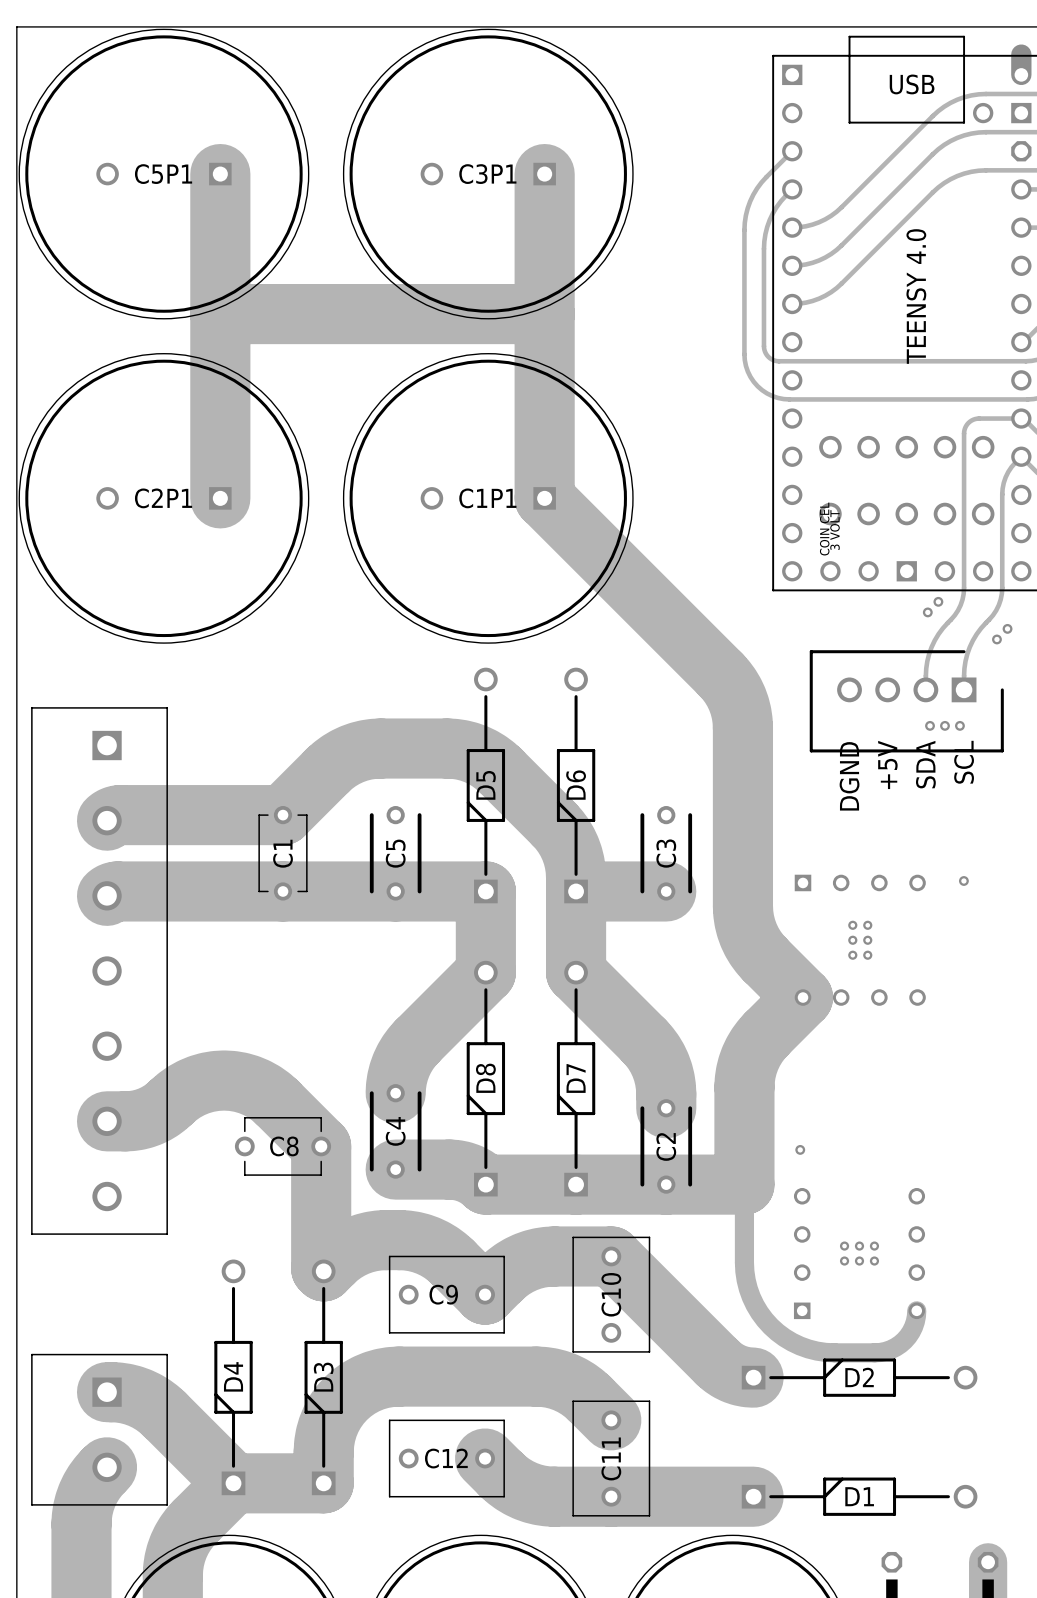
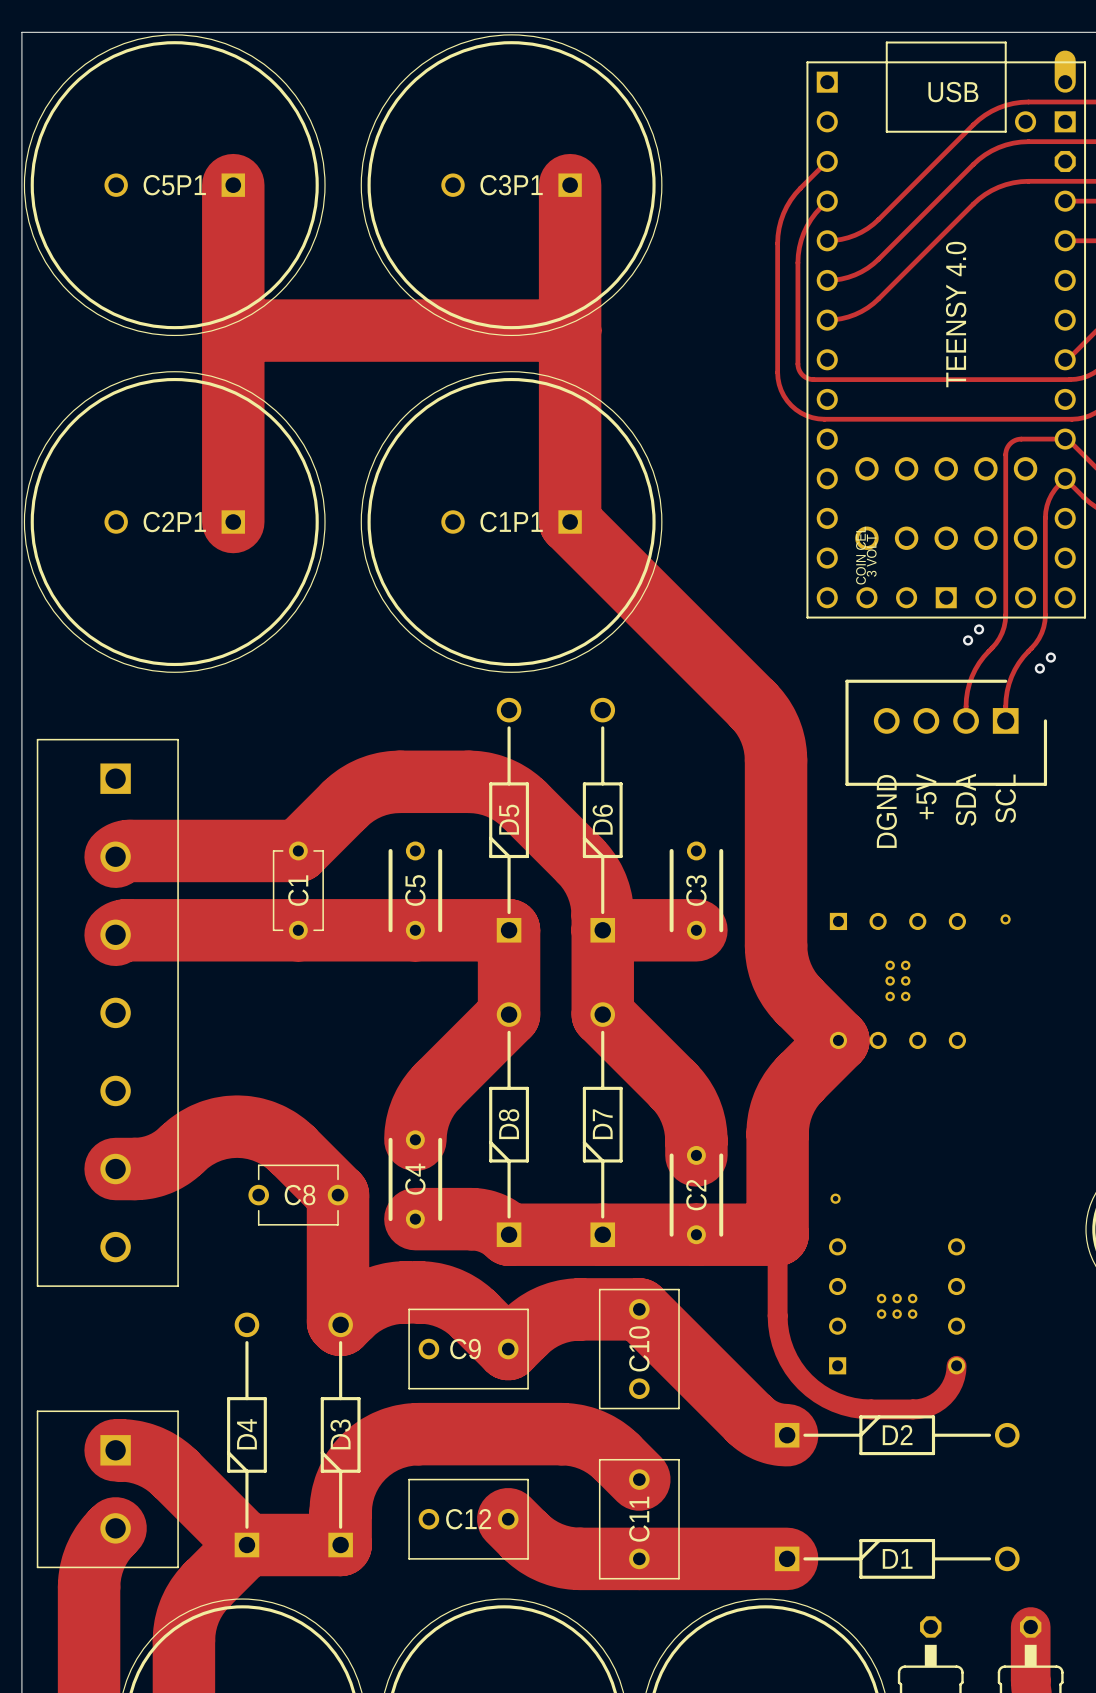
via: (930, 725) -> none
via: (944, 725) -> none
via: (959, 725) -> none

